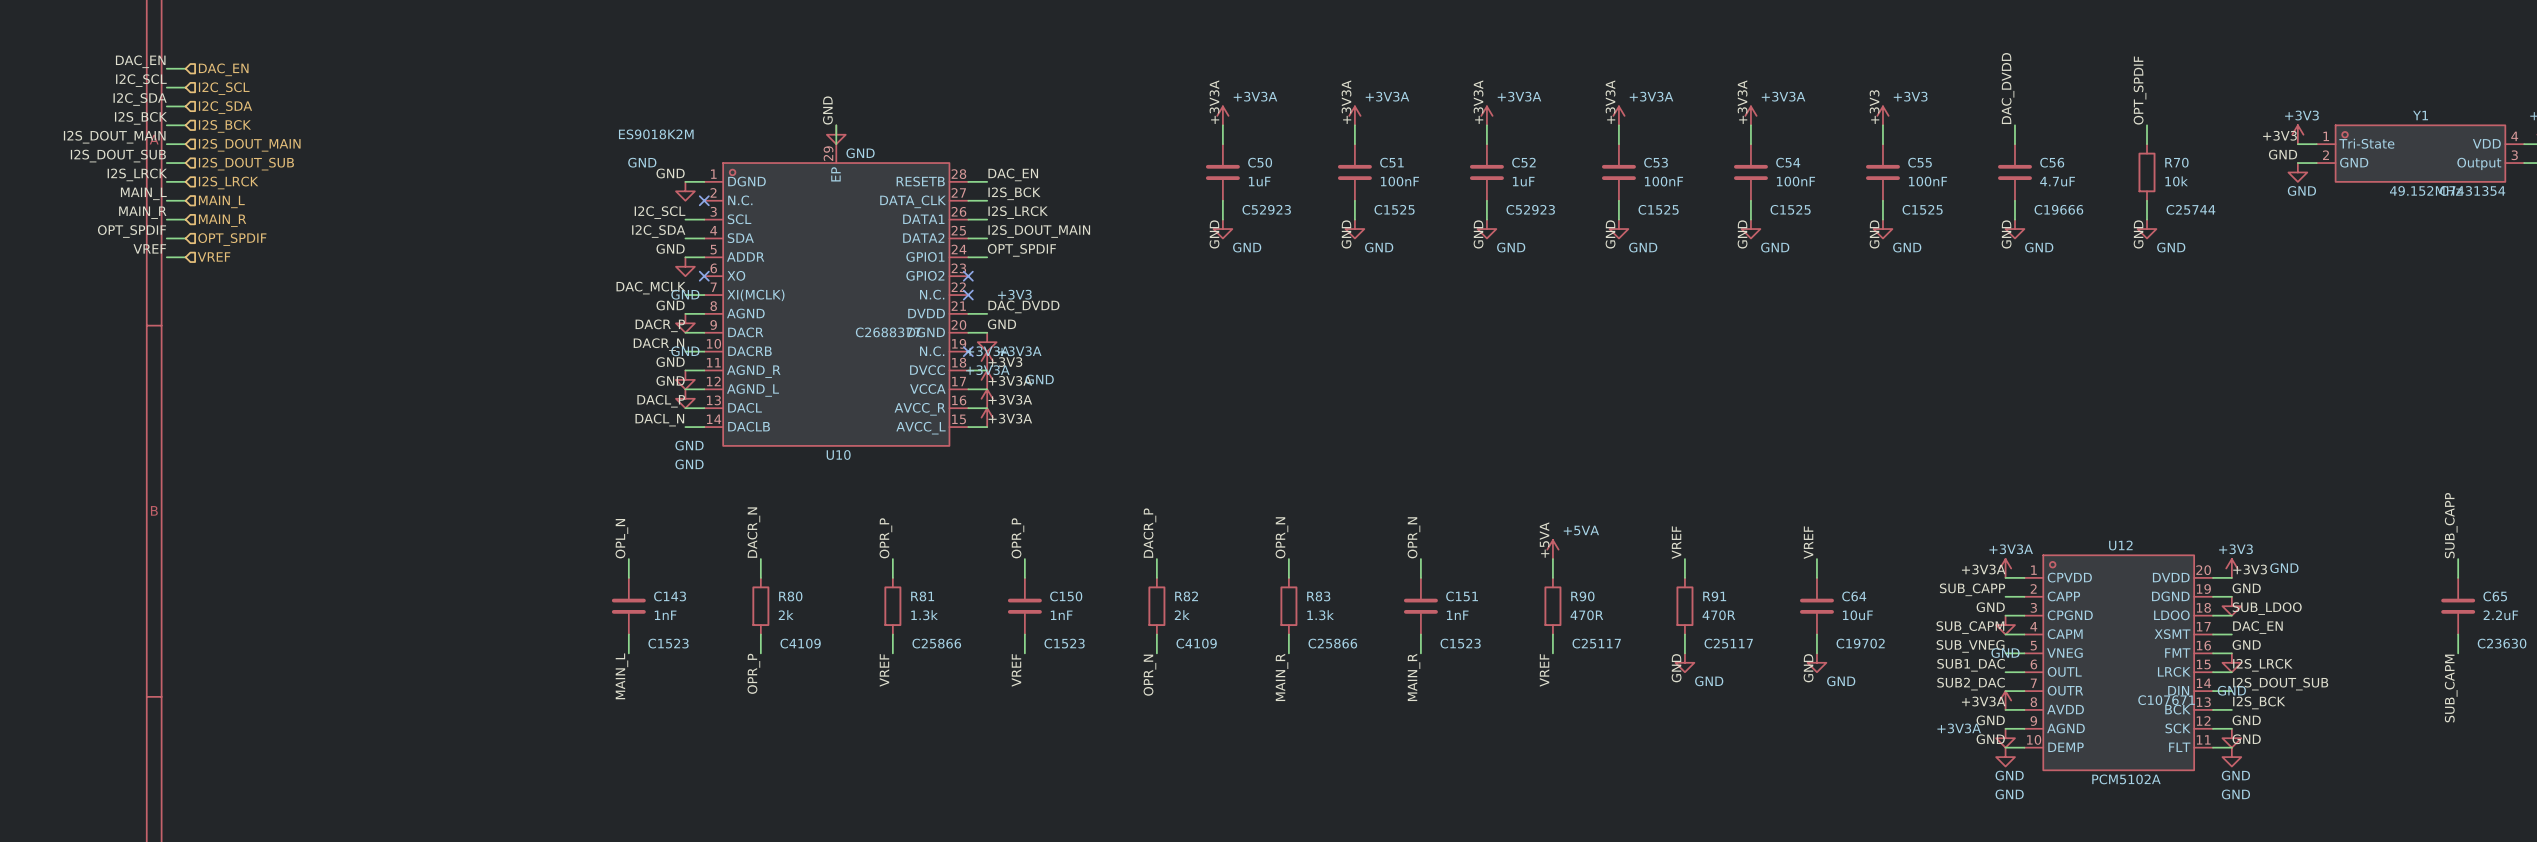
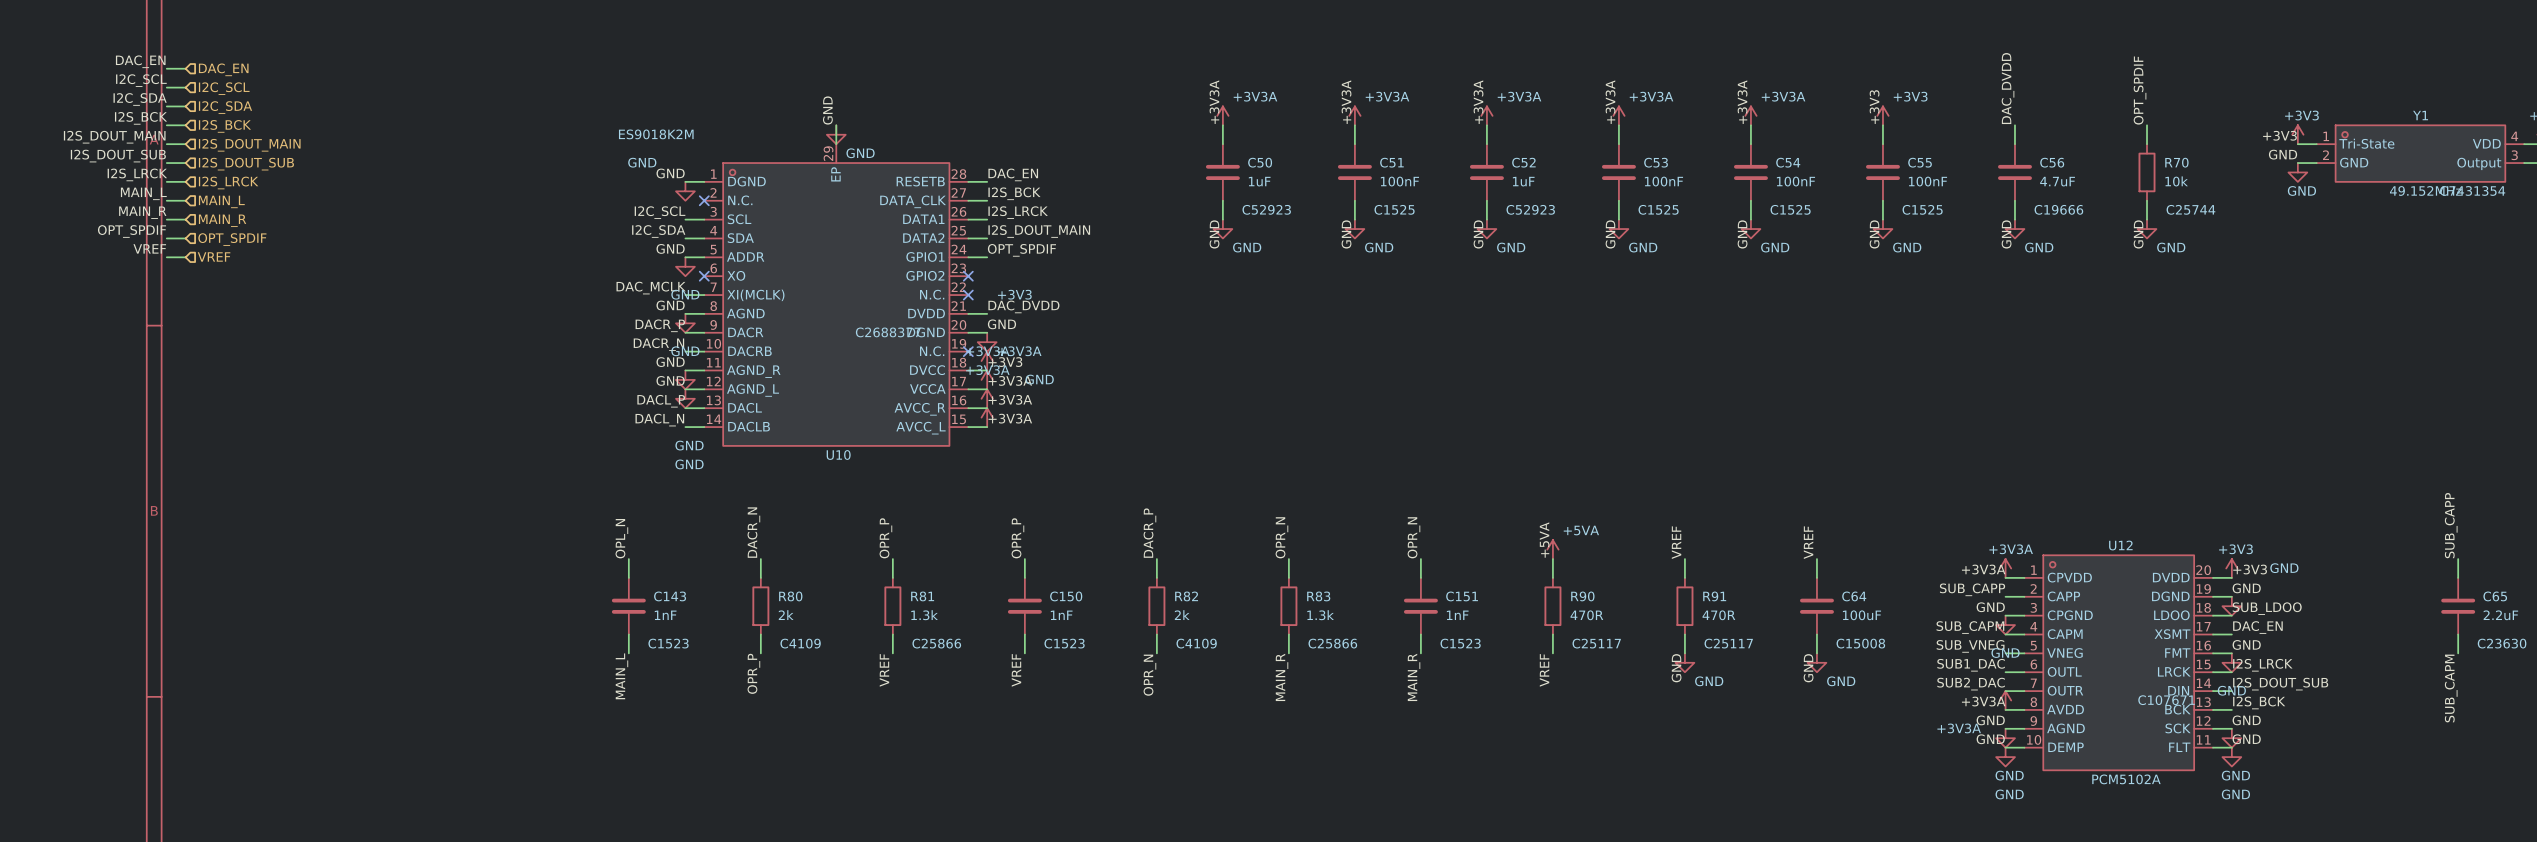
C64 value: 10uF (1857, 615) -> 100uF (1861, 615)
C64 text: C19702 (1860, 643) -> C15008 (1860, 643)

